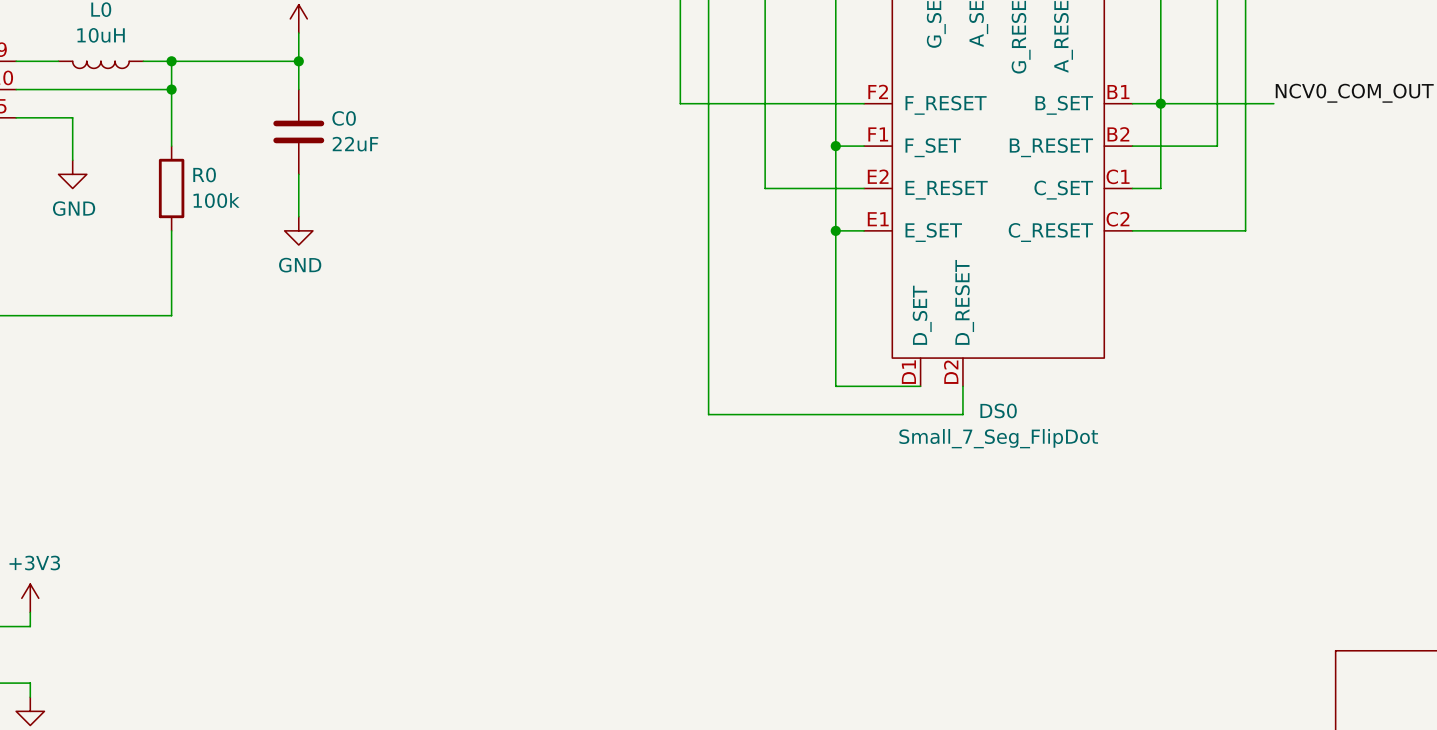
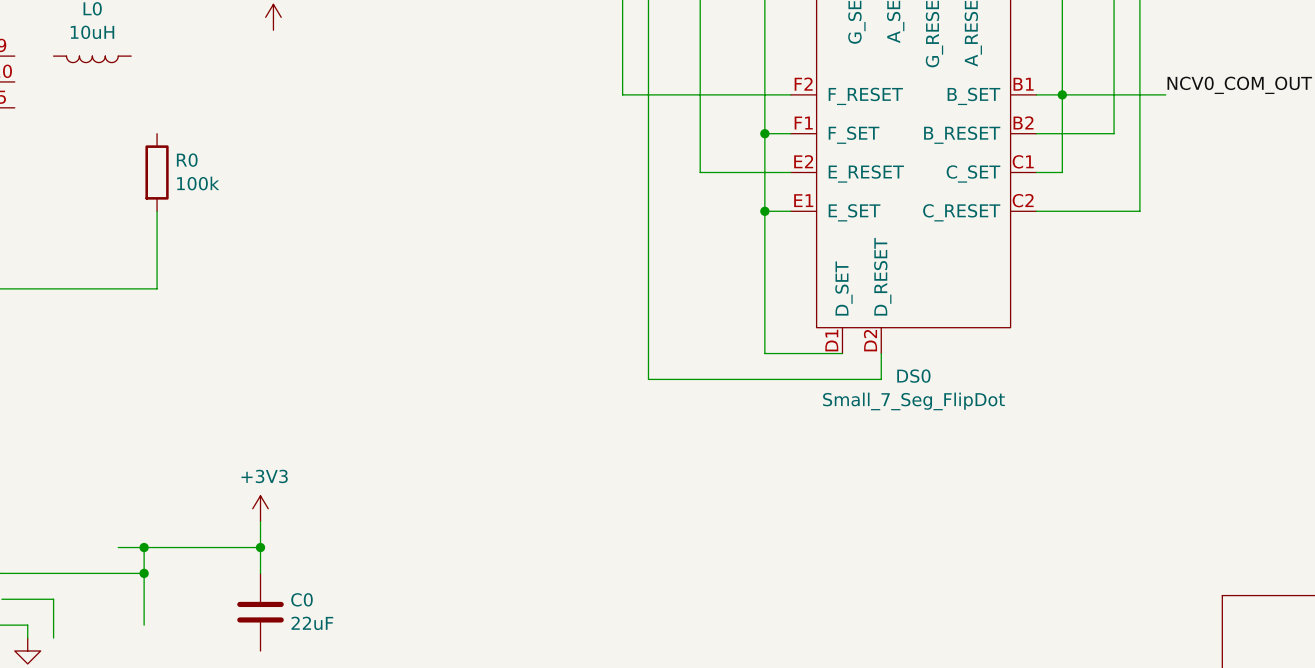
wire: (298, 33) (298, 89) -> none
wire: (16, 61) (58, 61) -> none
wire: (143, 61) (298, 61) -> none
wire: (171, 61) (171, 146) -> none
junction: (171, 61) -> none
junction: (298, 61) -> none
wire: (16, 89) (171, 89) -> none
junction: (171, 89) -> none
wire: (16, 117) (72, 117) (72, 160) -> none
C0 position: (298, 131) -> (260, 612)
power symbol: GND (72, 174) -> none
wire: (298, 174) (298, 216) -> none
power symbol: GND (298, 230) -> none
wire: none -> (260, 521) (260, 573)
power symbol position: +3V3 (30, 598) -> +3V3 (260, 508)
wire: none -> (118, 547) (260, 547)
wire: none -> (144, 547) (144, 625)
junction: none -> (144, 547)
junction: none -> (260, 547)
wire: (30, 612) (30, 626) -> (144, 573) (27, 573)
junction: none -> (144, 573)
wire: none -> (1, 599) (53, 599) (53, 638)

